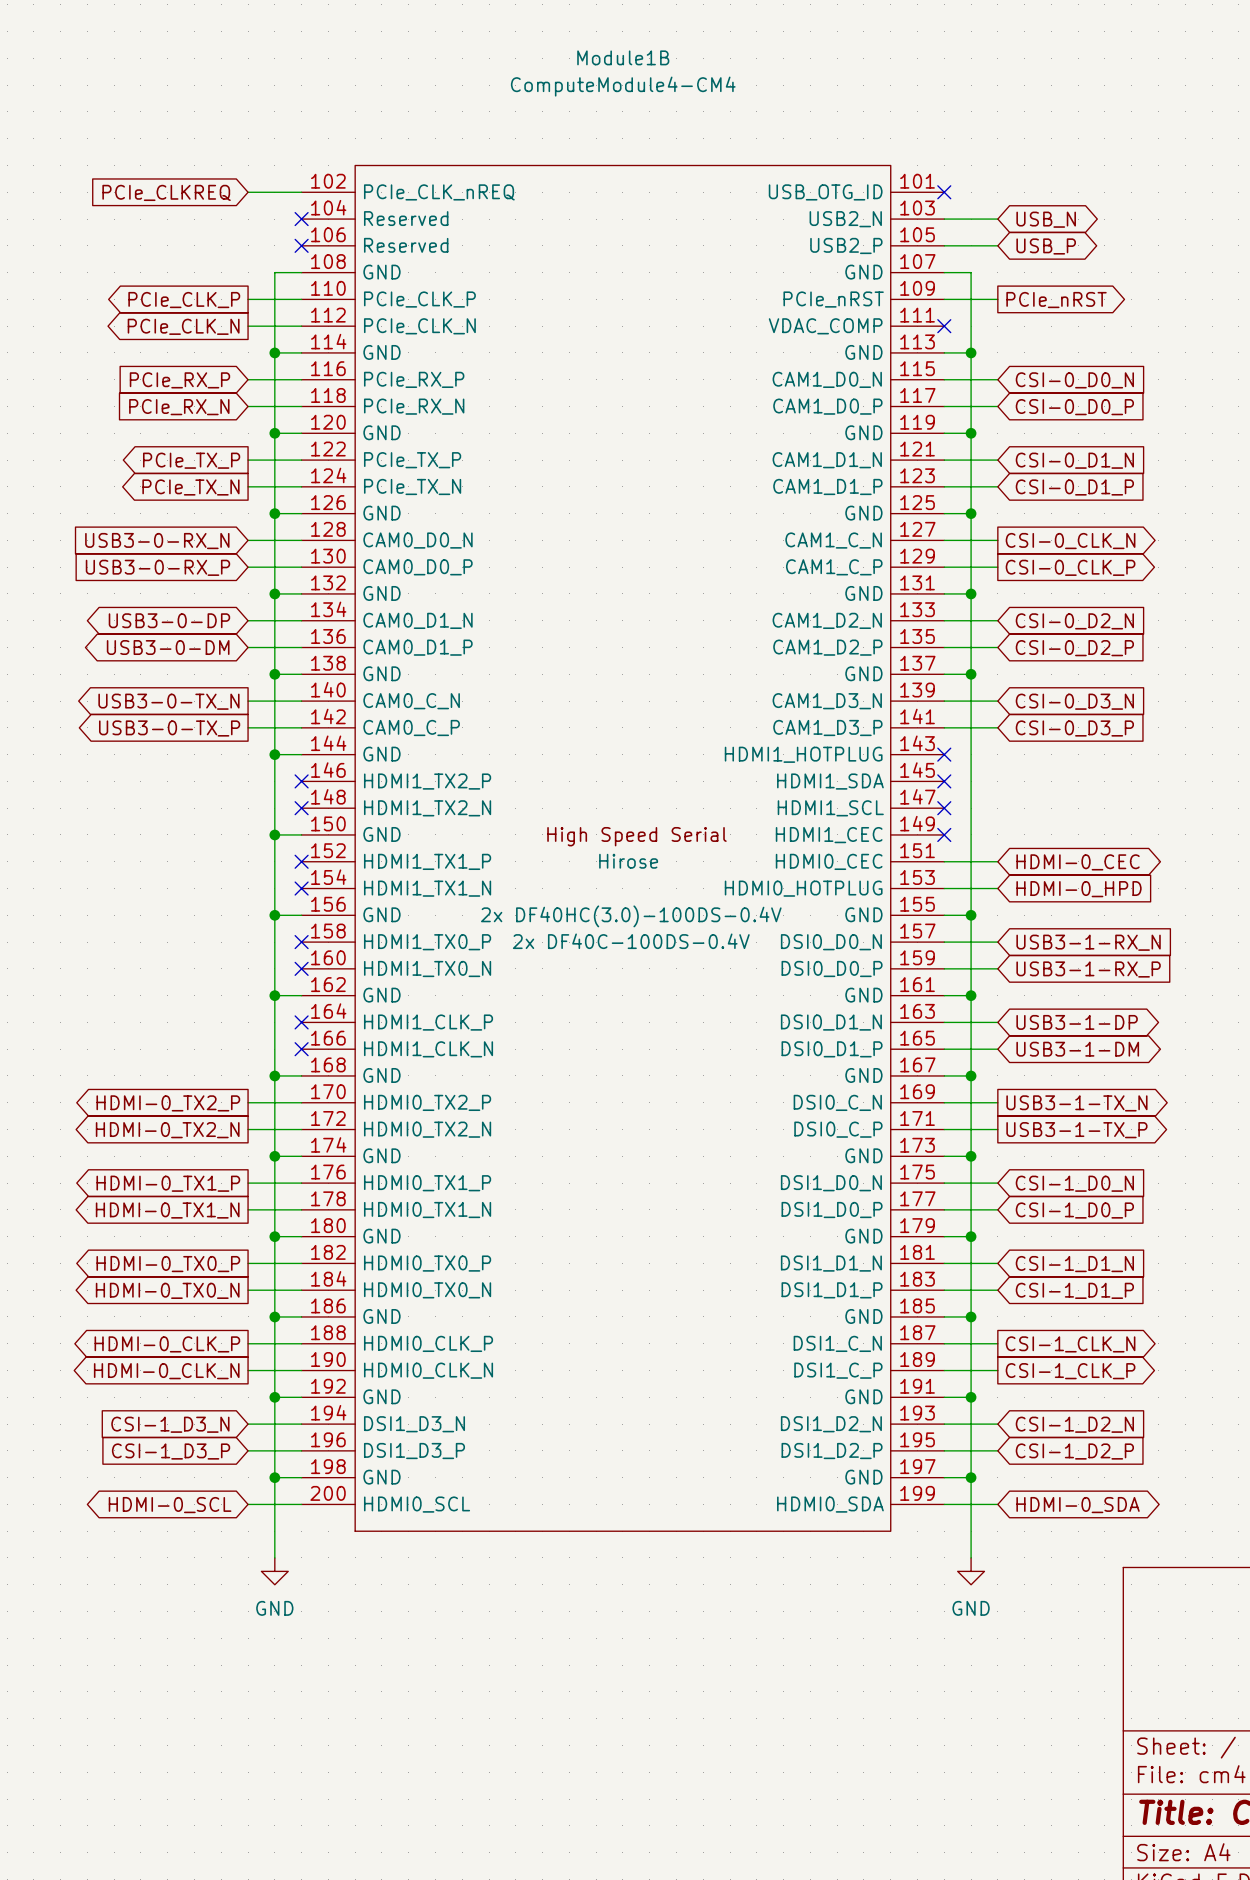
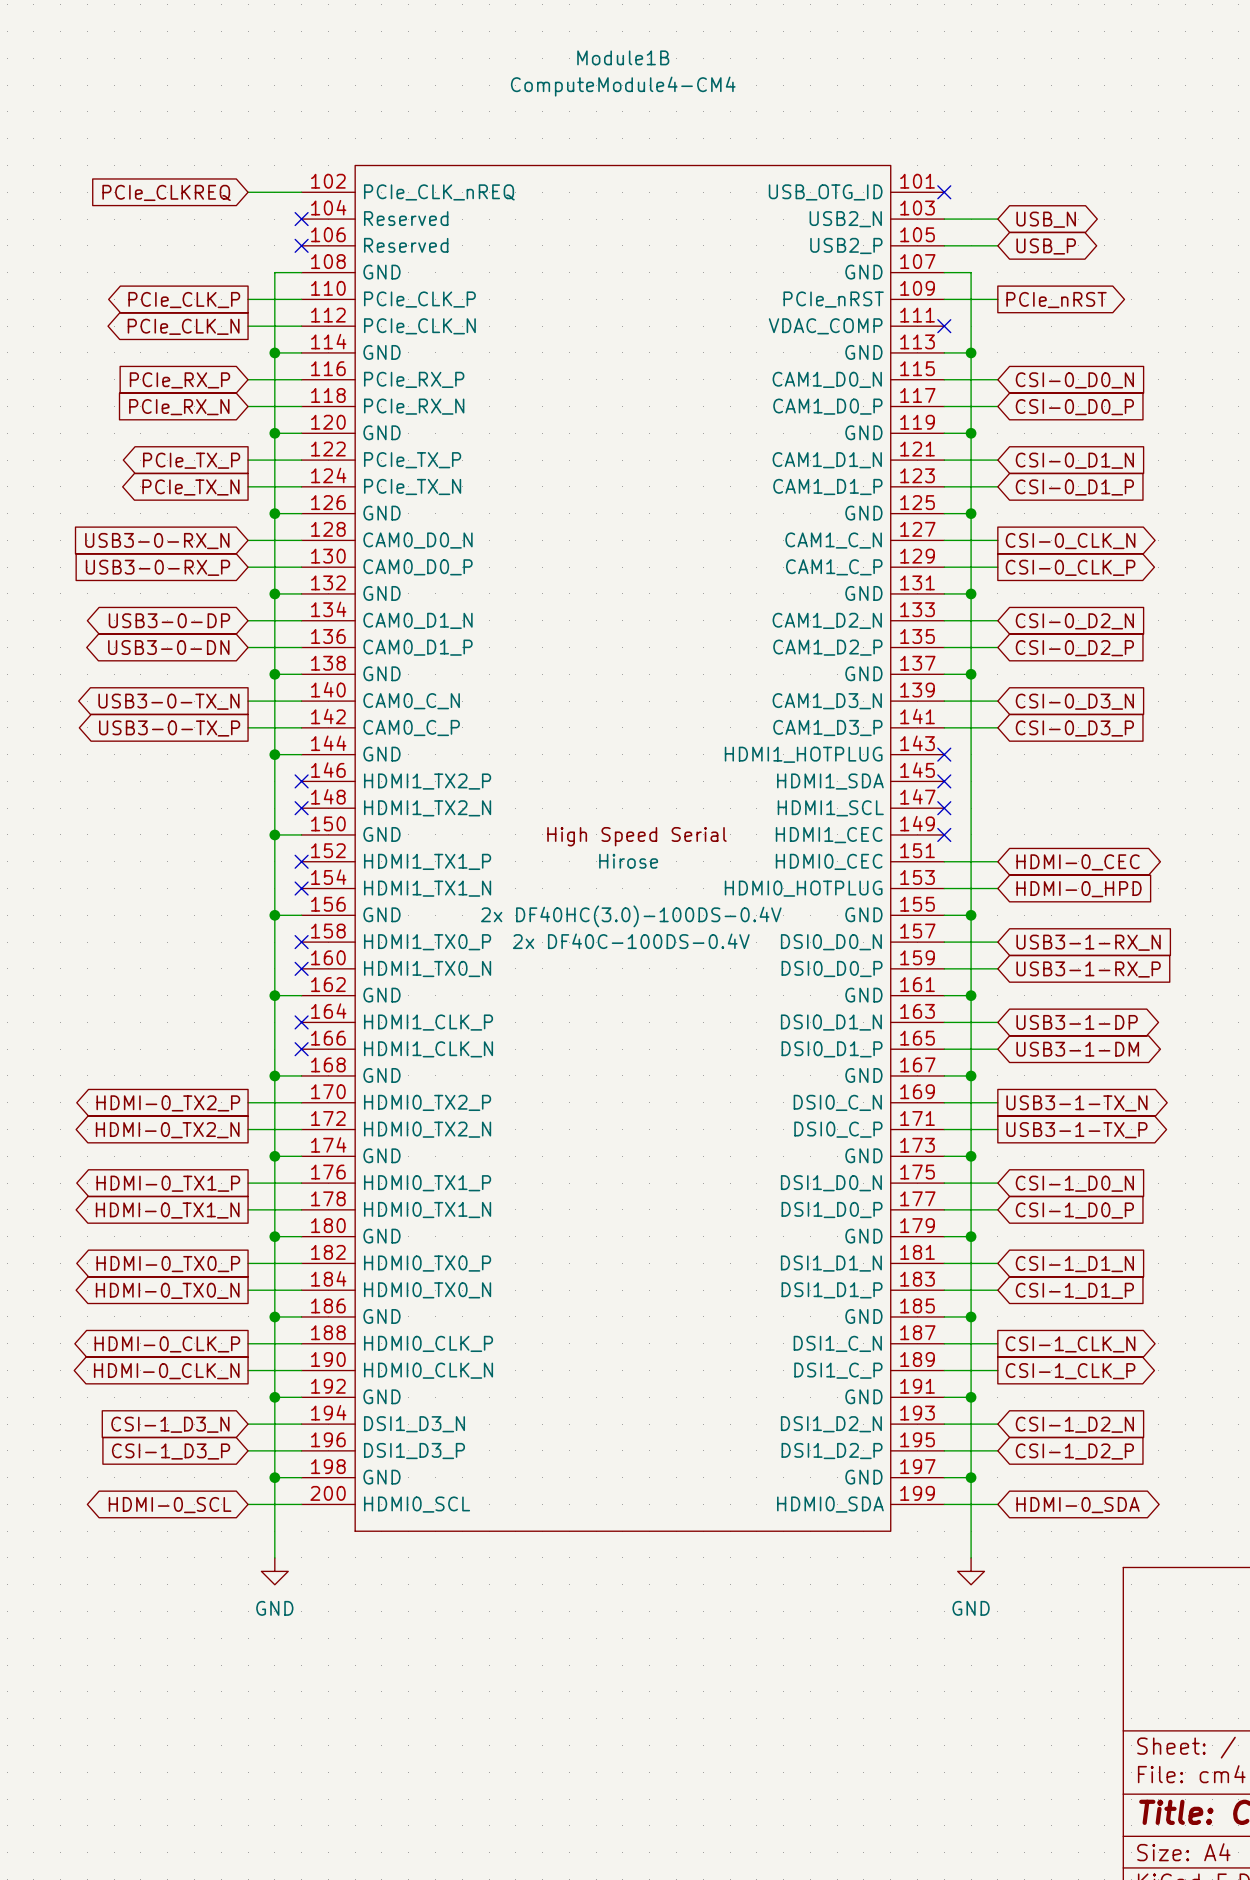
global label: USB3-0-DM (168, 647) -> USB3-0-DN (168, 647)

